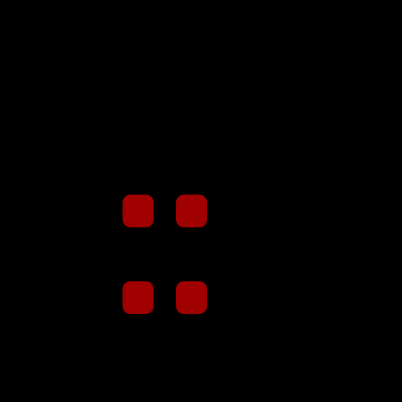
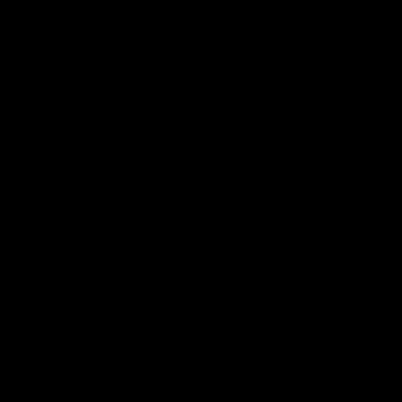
part: (164, 210) -> none
part: (164, 297) -> none

